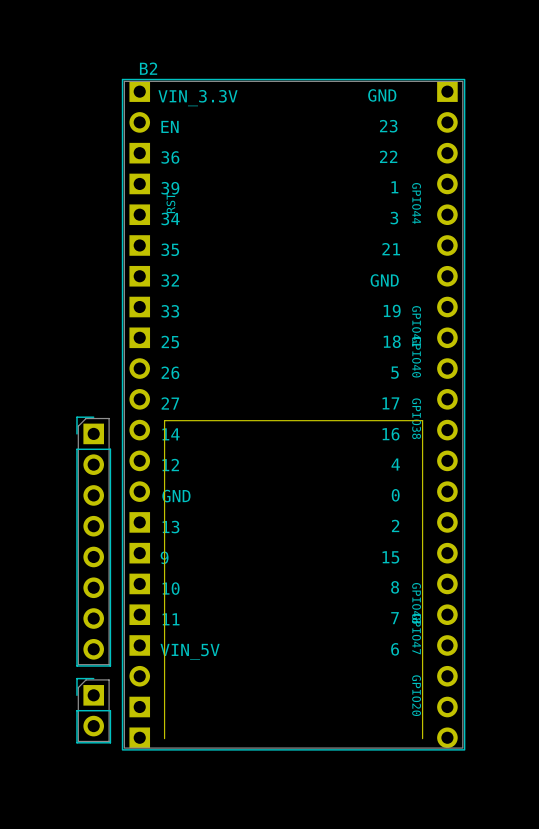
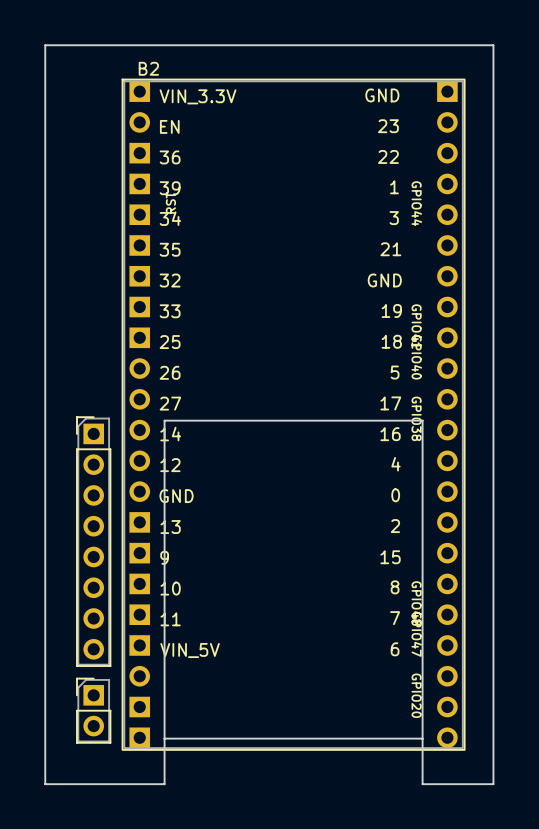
board edge: none -> (45, 45) (493, 45) (493, 784) (422, 784) (422, 738) (164, 738) (164, 784) (45, 784) (45, 45)

